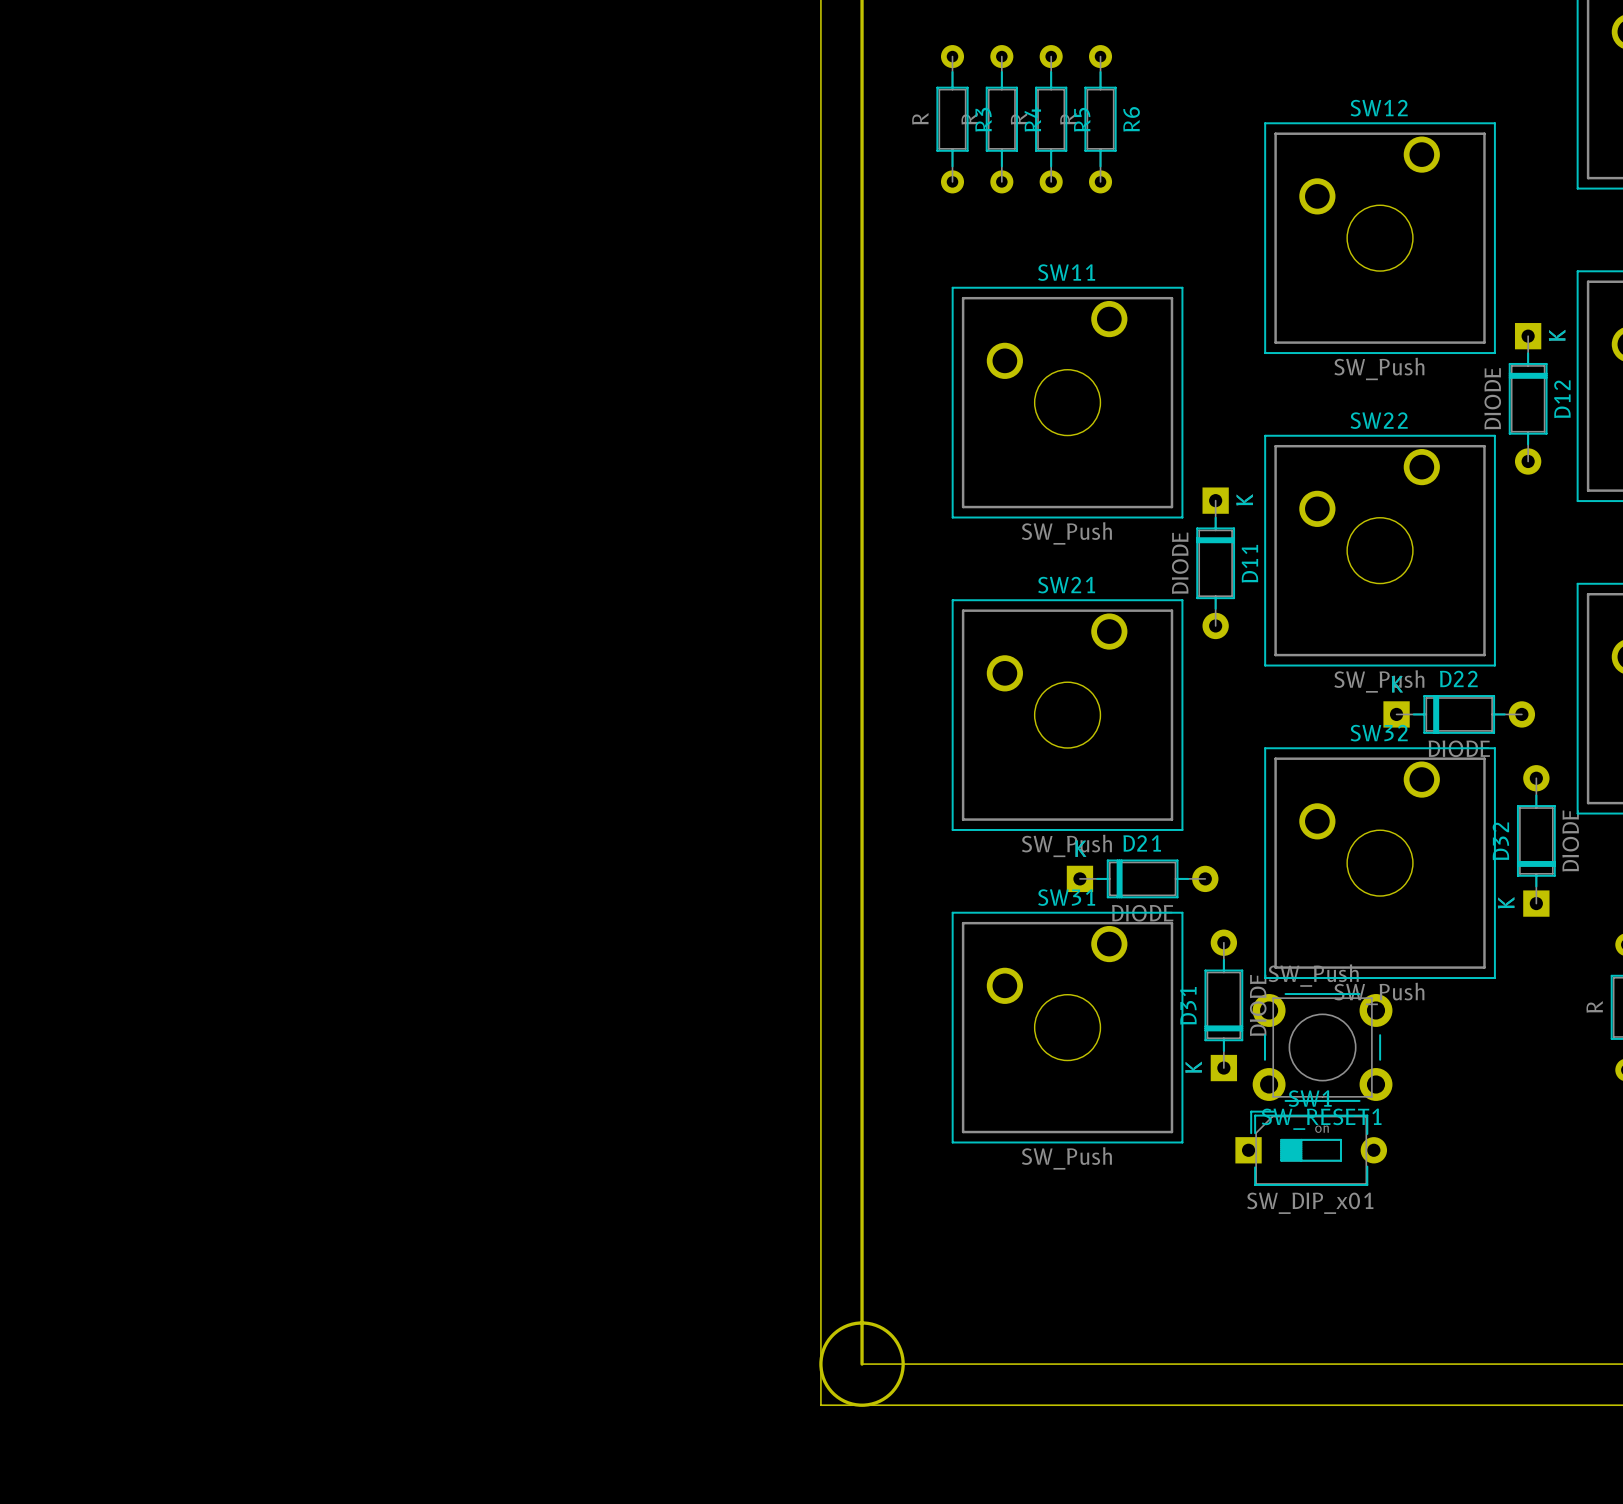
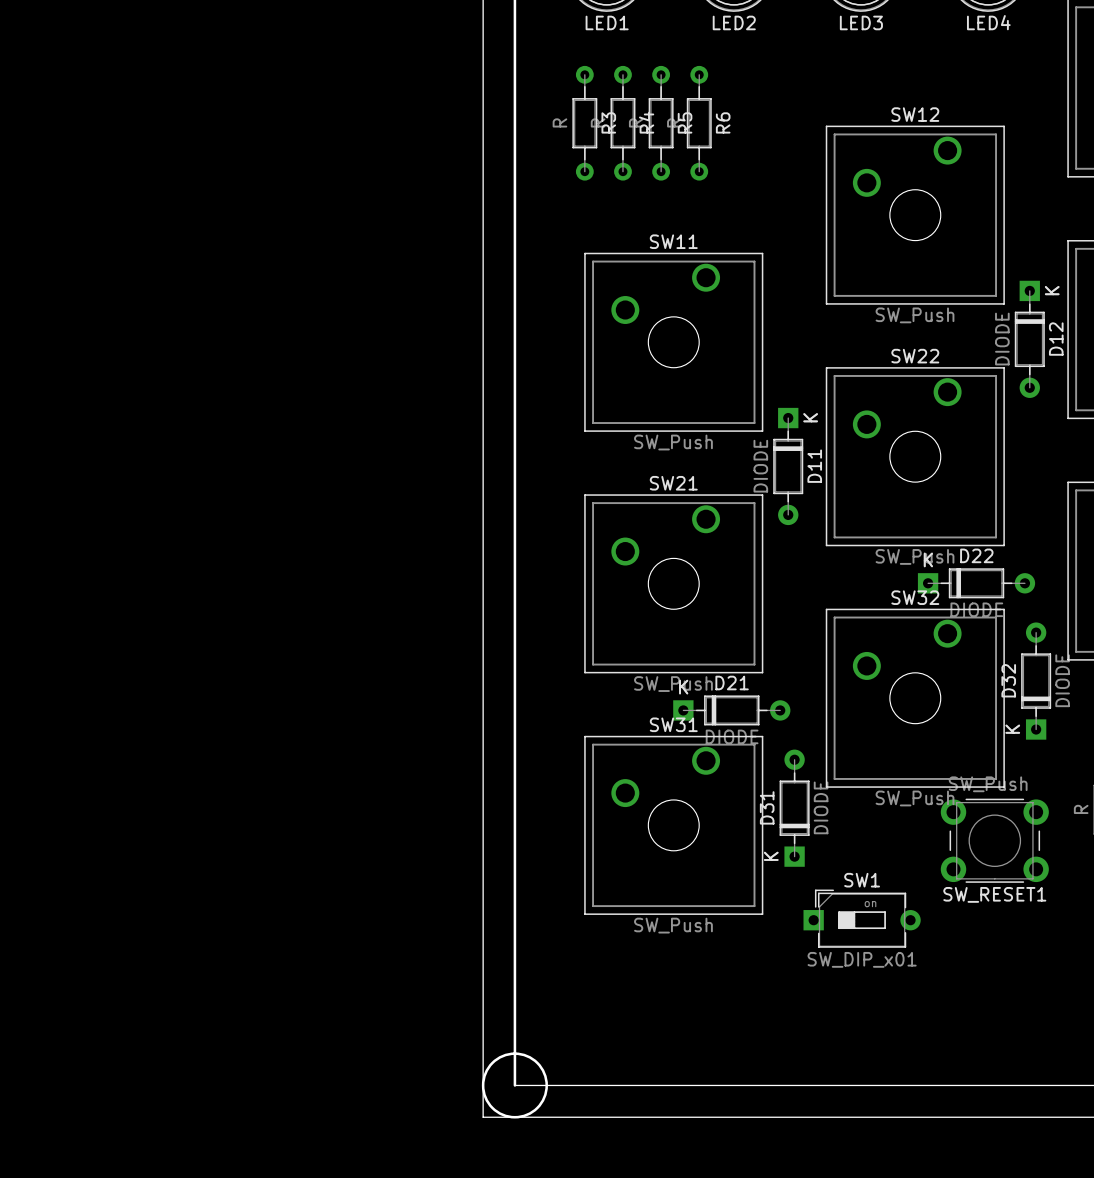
SW_RESET1 position: (1322, 1047) -> (994, 840)

